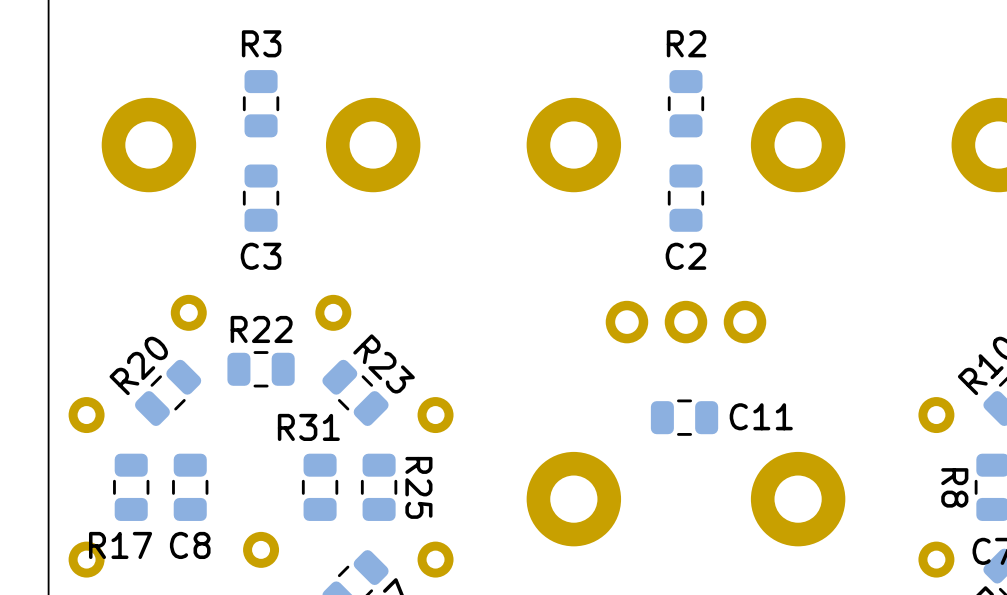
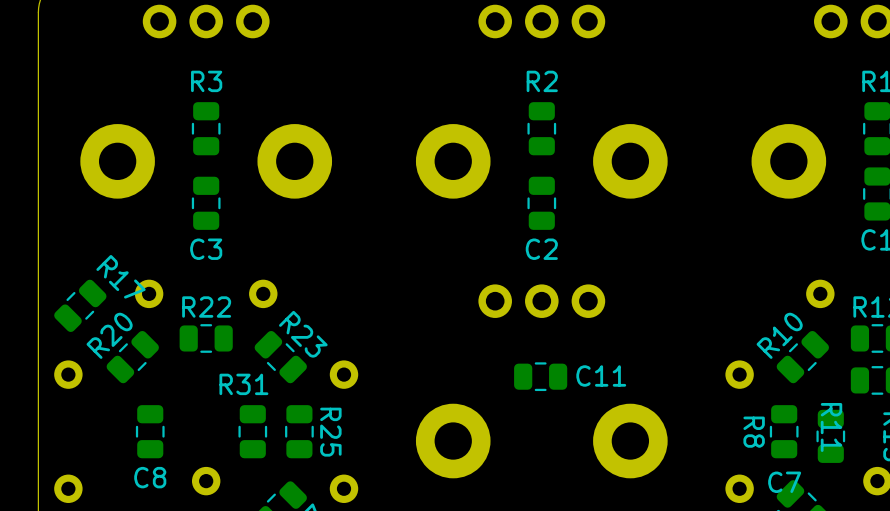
R17 rotation: 0° (131, 487) -> 45° clockwise (80, 305)
R17 position: (131, 487) -> (80, 305)
R17 name position: R17 (120, 545) -> R17 (121, 276)

